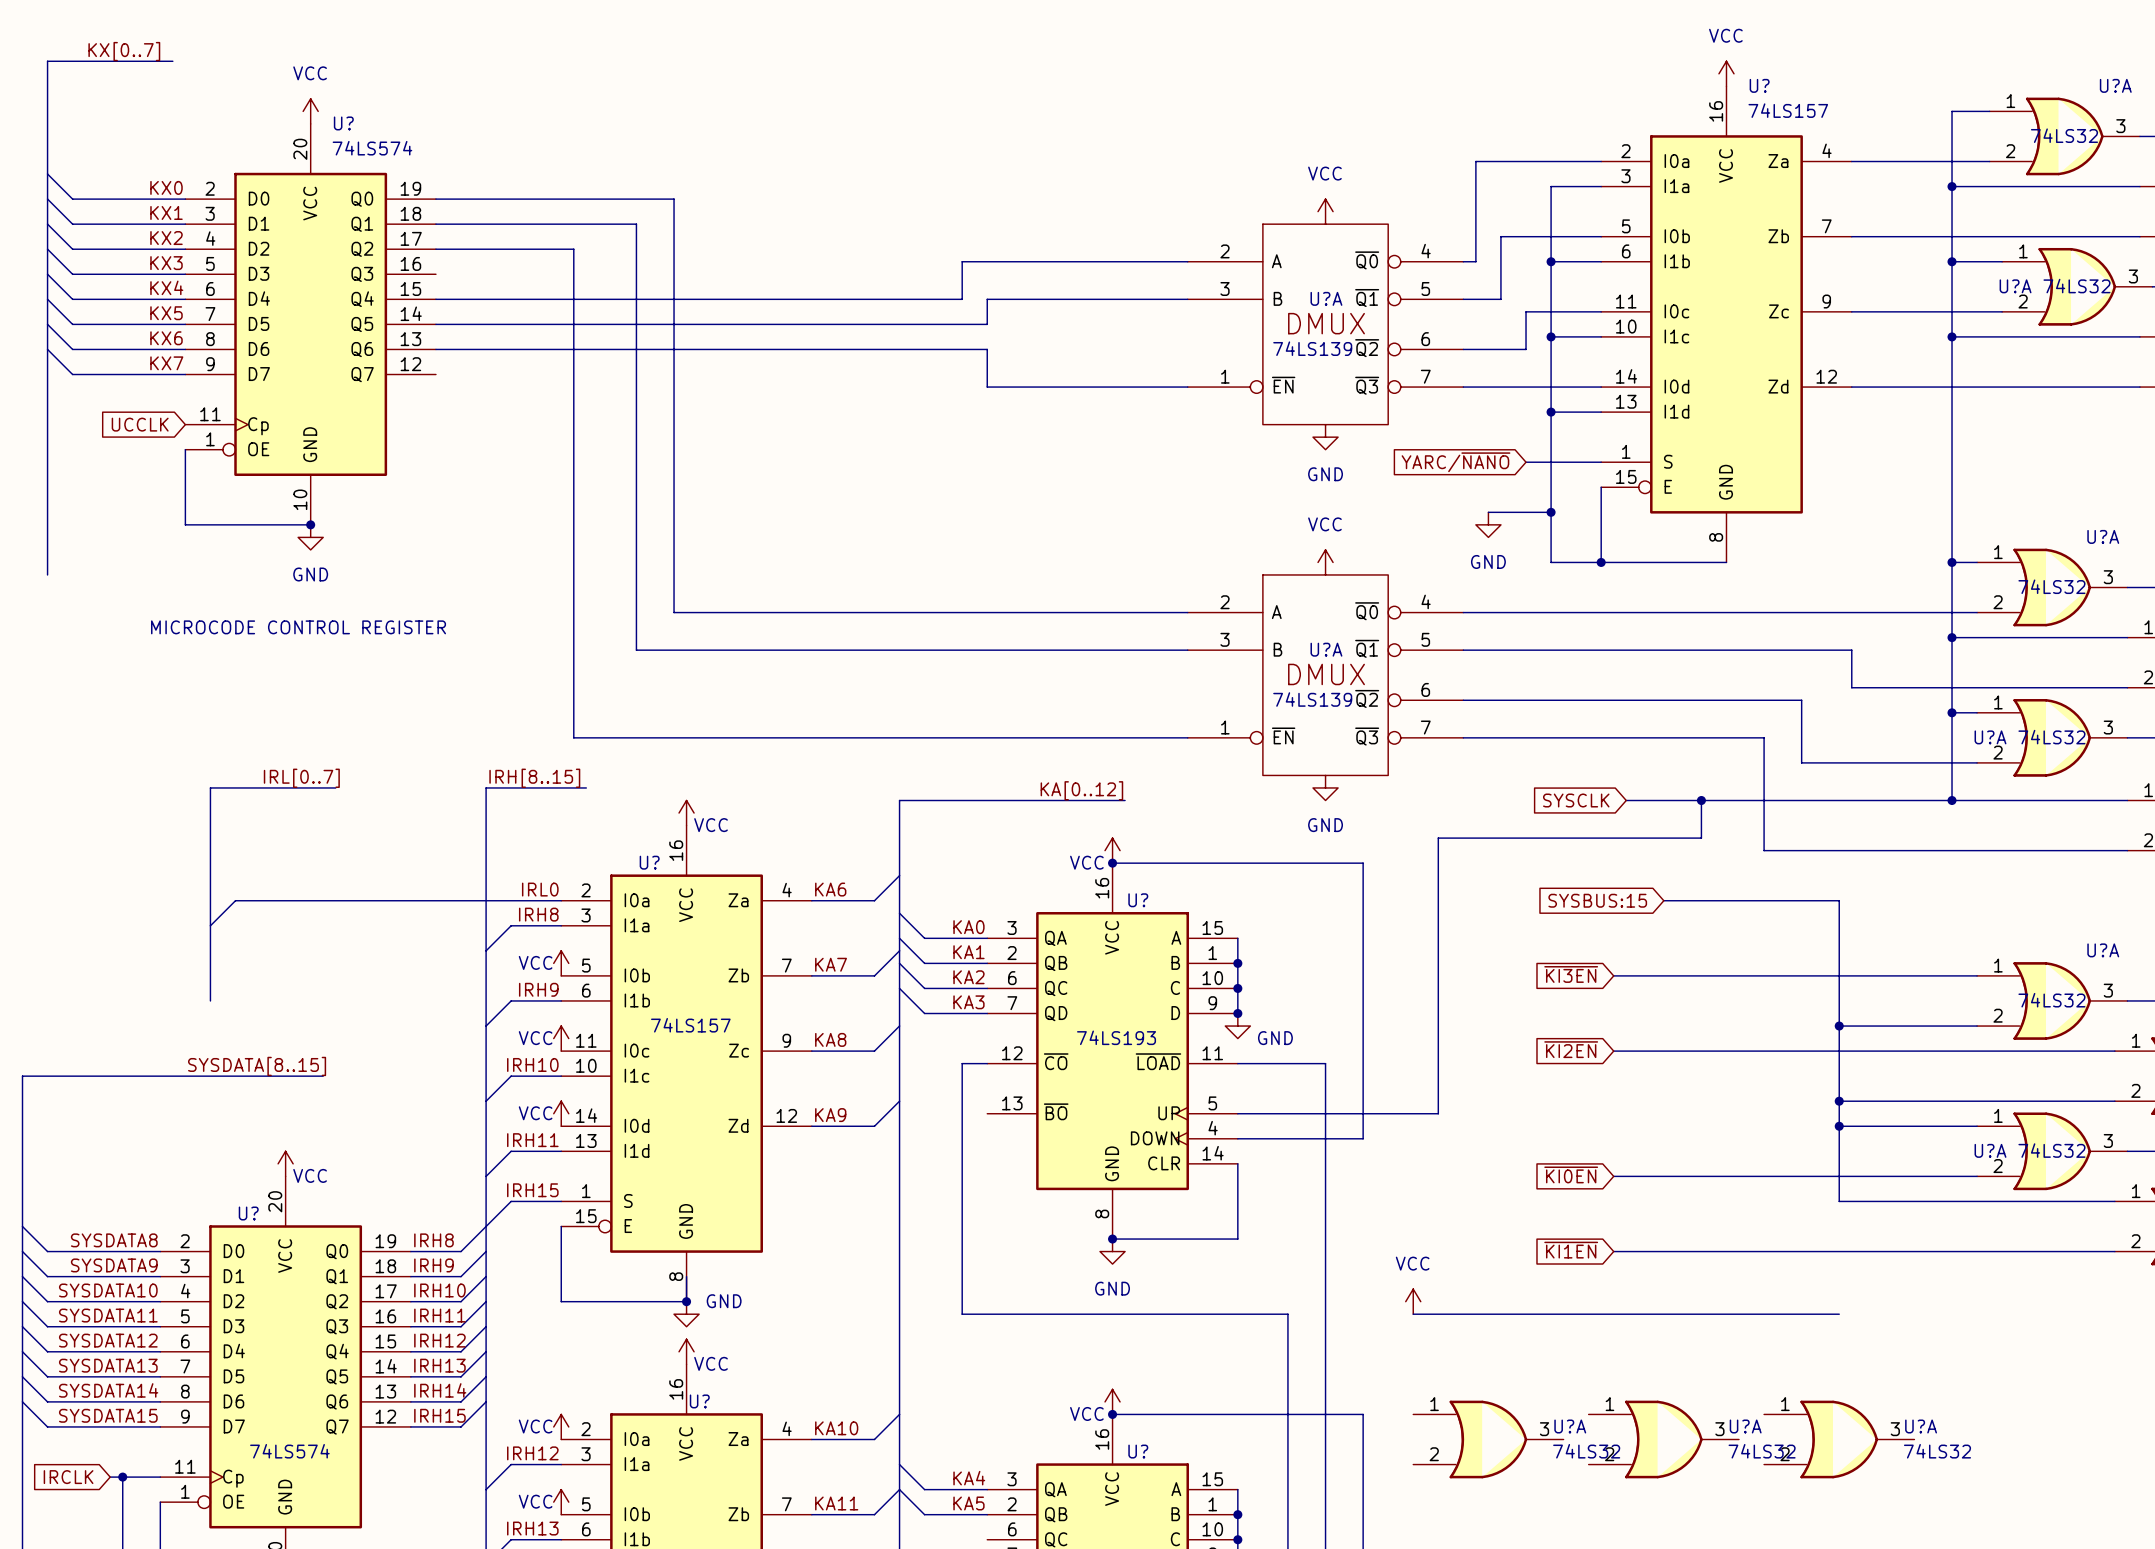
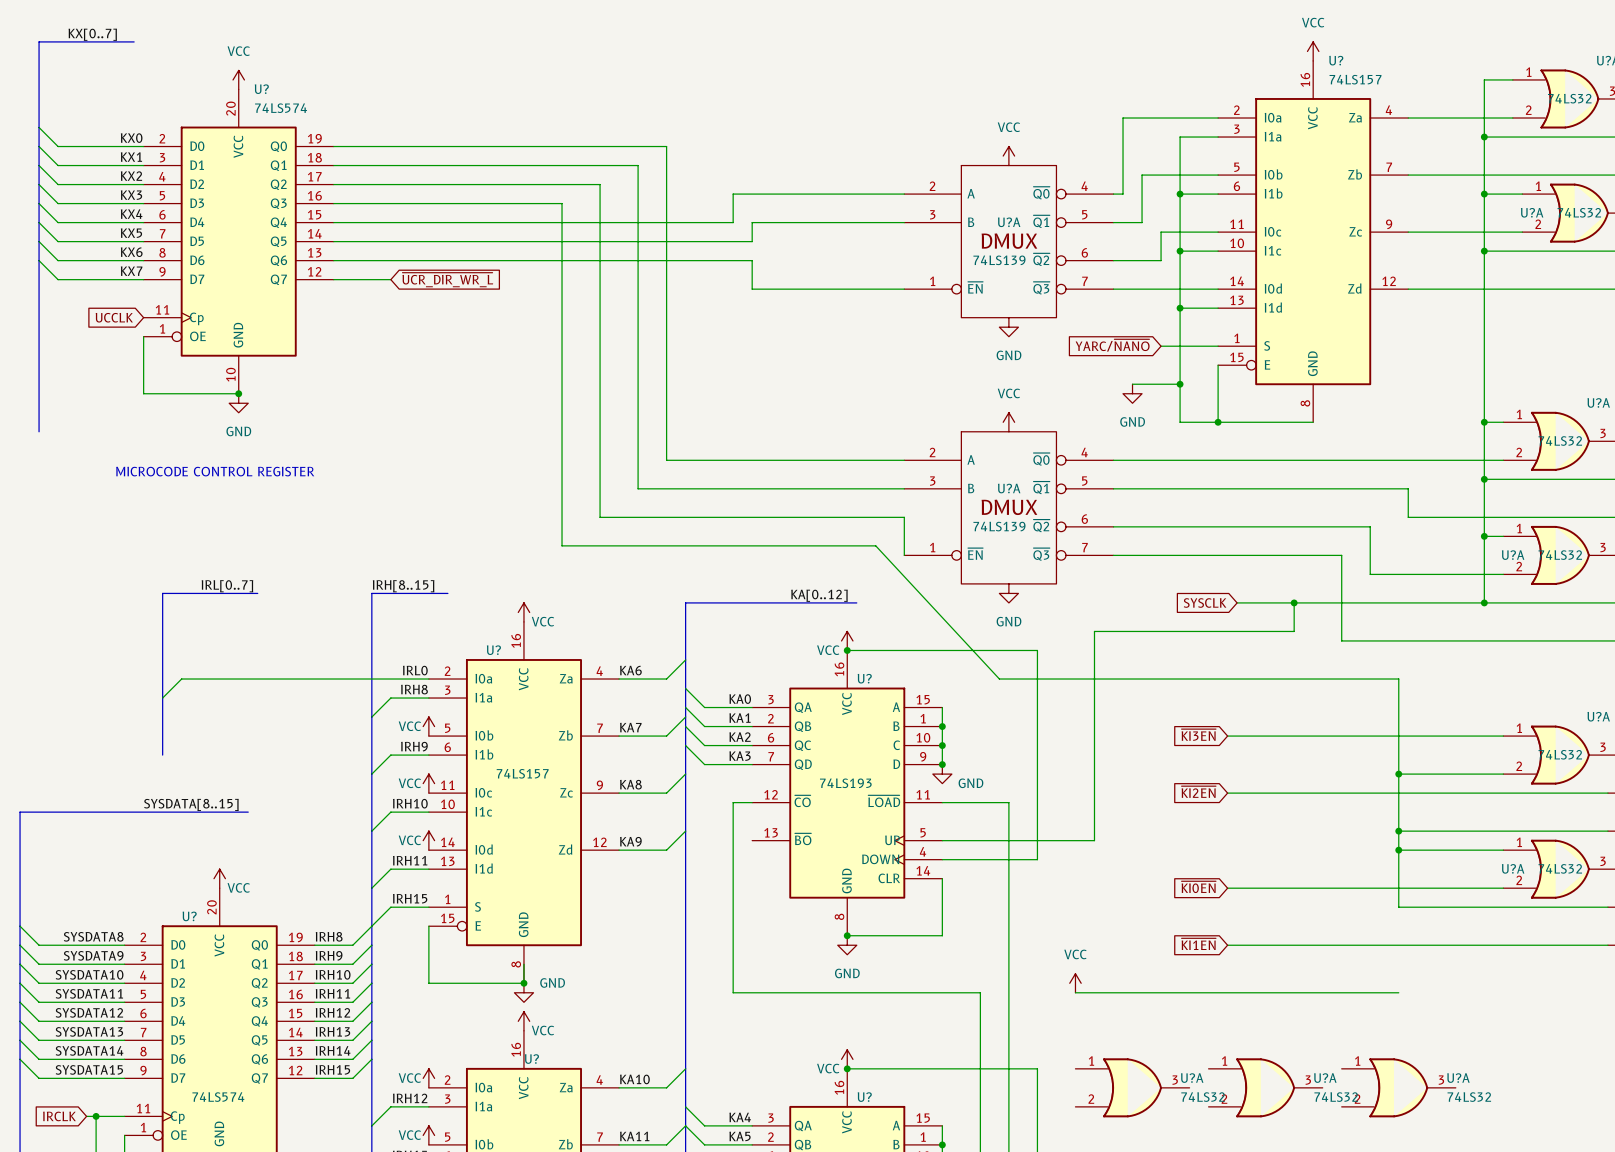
wire: (674, 199) (674, 612) (874, 612) -> (514, 146) (666, 146) (666, 460)
wire: (636, 224) (636, 650) (836, 650) -> (485, 165) (638, 165) (638, 488)
wire: (573, 249) (573, 737) (1187, 737) -> (438, 184) (600, 184) (600, 517) (904, 517) (904, 555)
wire: none -> (333, 203) (562, 203) (562, 545) (875, 545) (999, 679) (1265, 679)
global label: none -> ~{UCR_DIR_WR_L} (447, 279)
wire: none -> (333, 279) (390, 279)
global label: SYSBUS:15 (1597, 900) -> none

